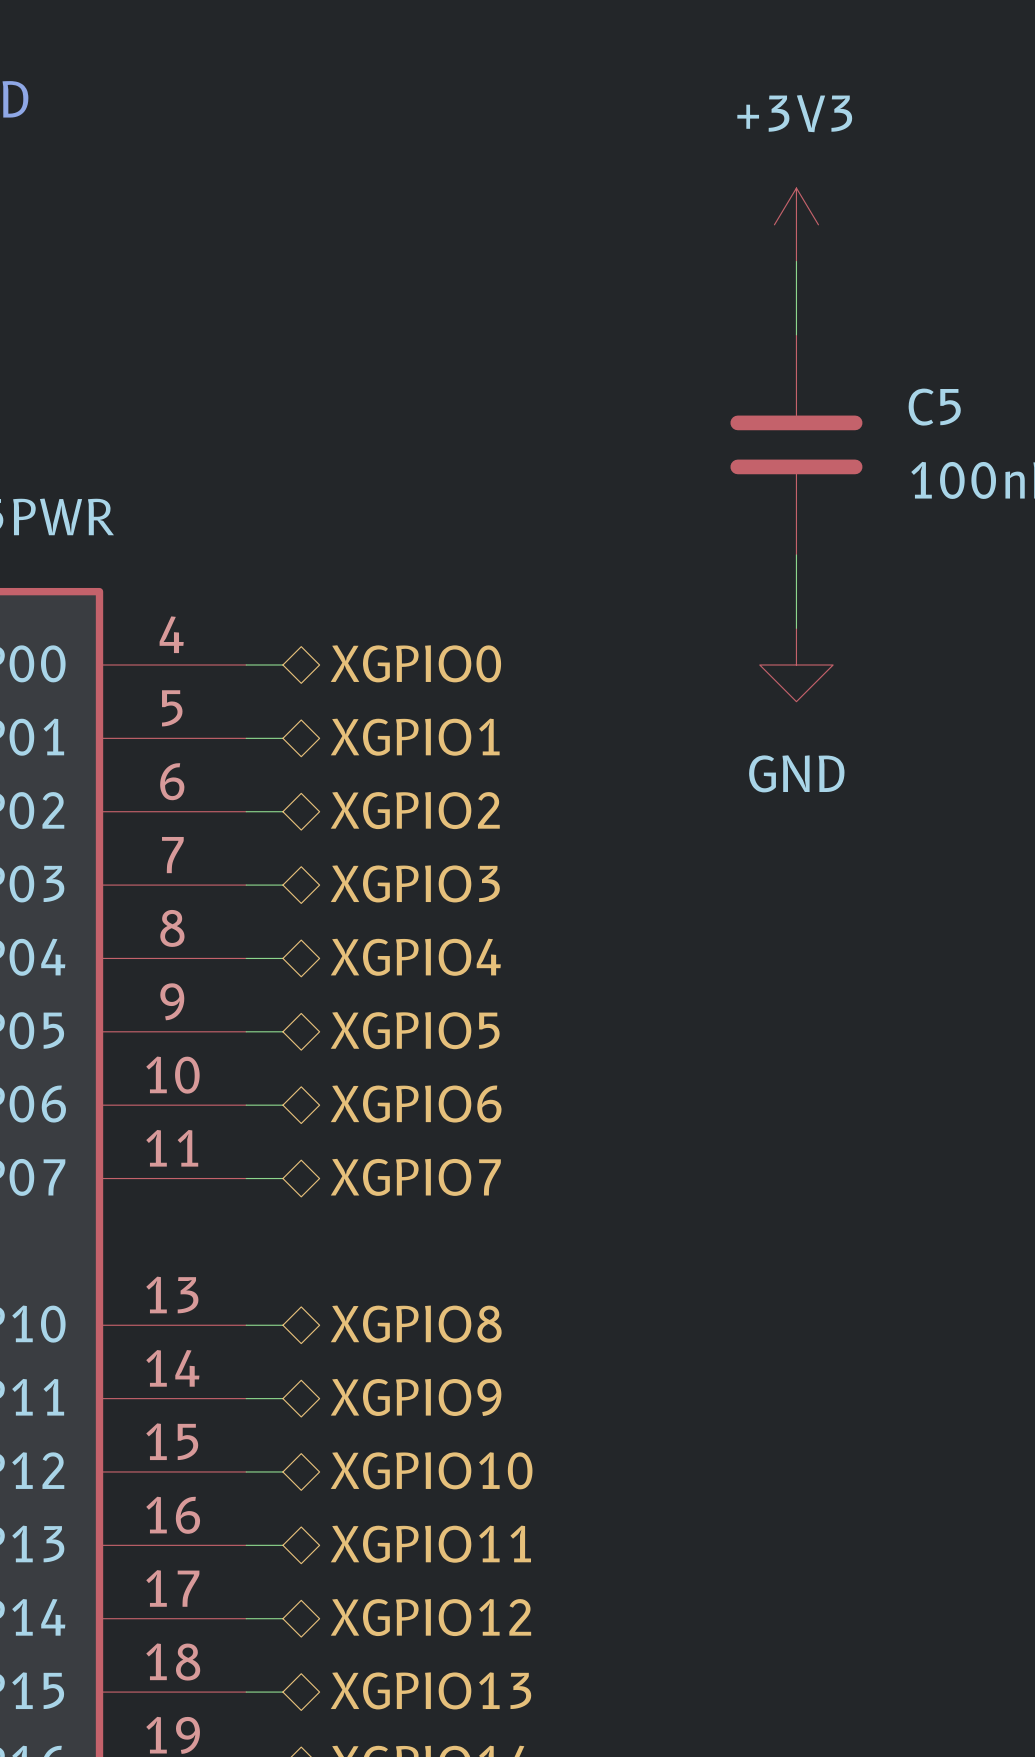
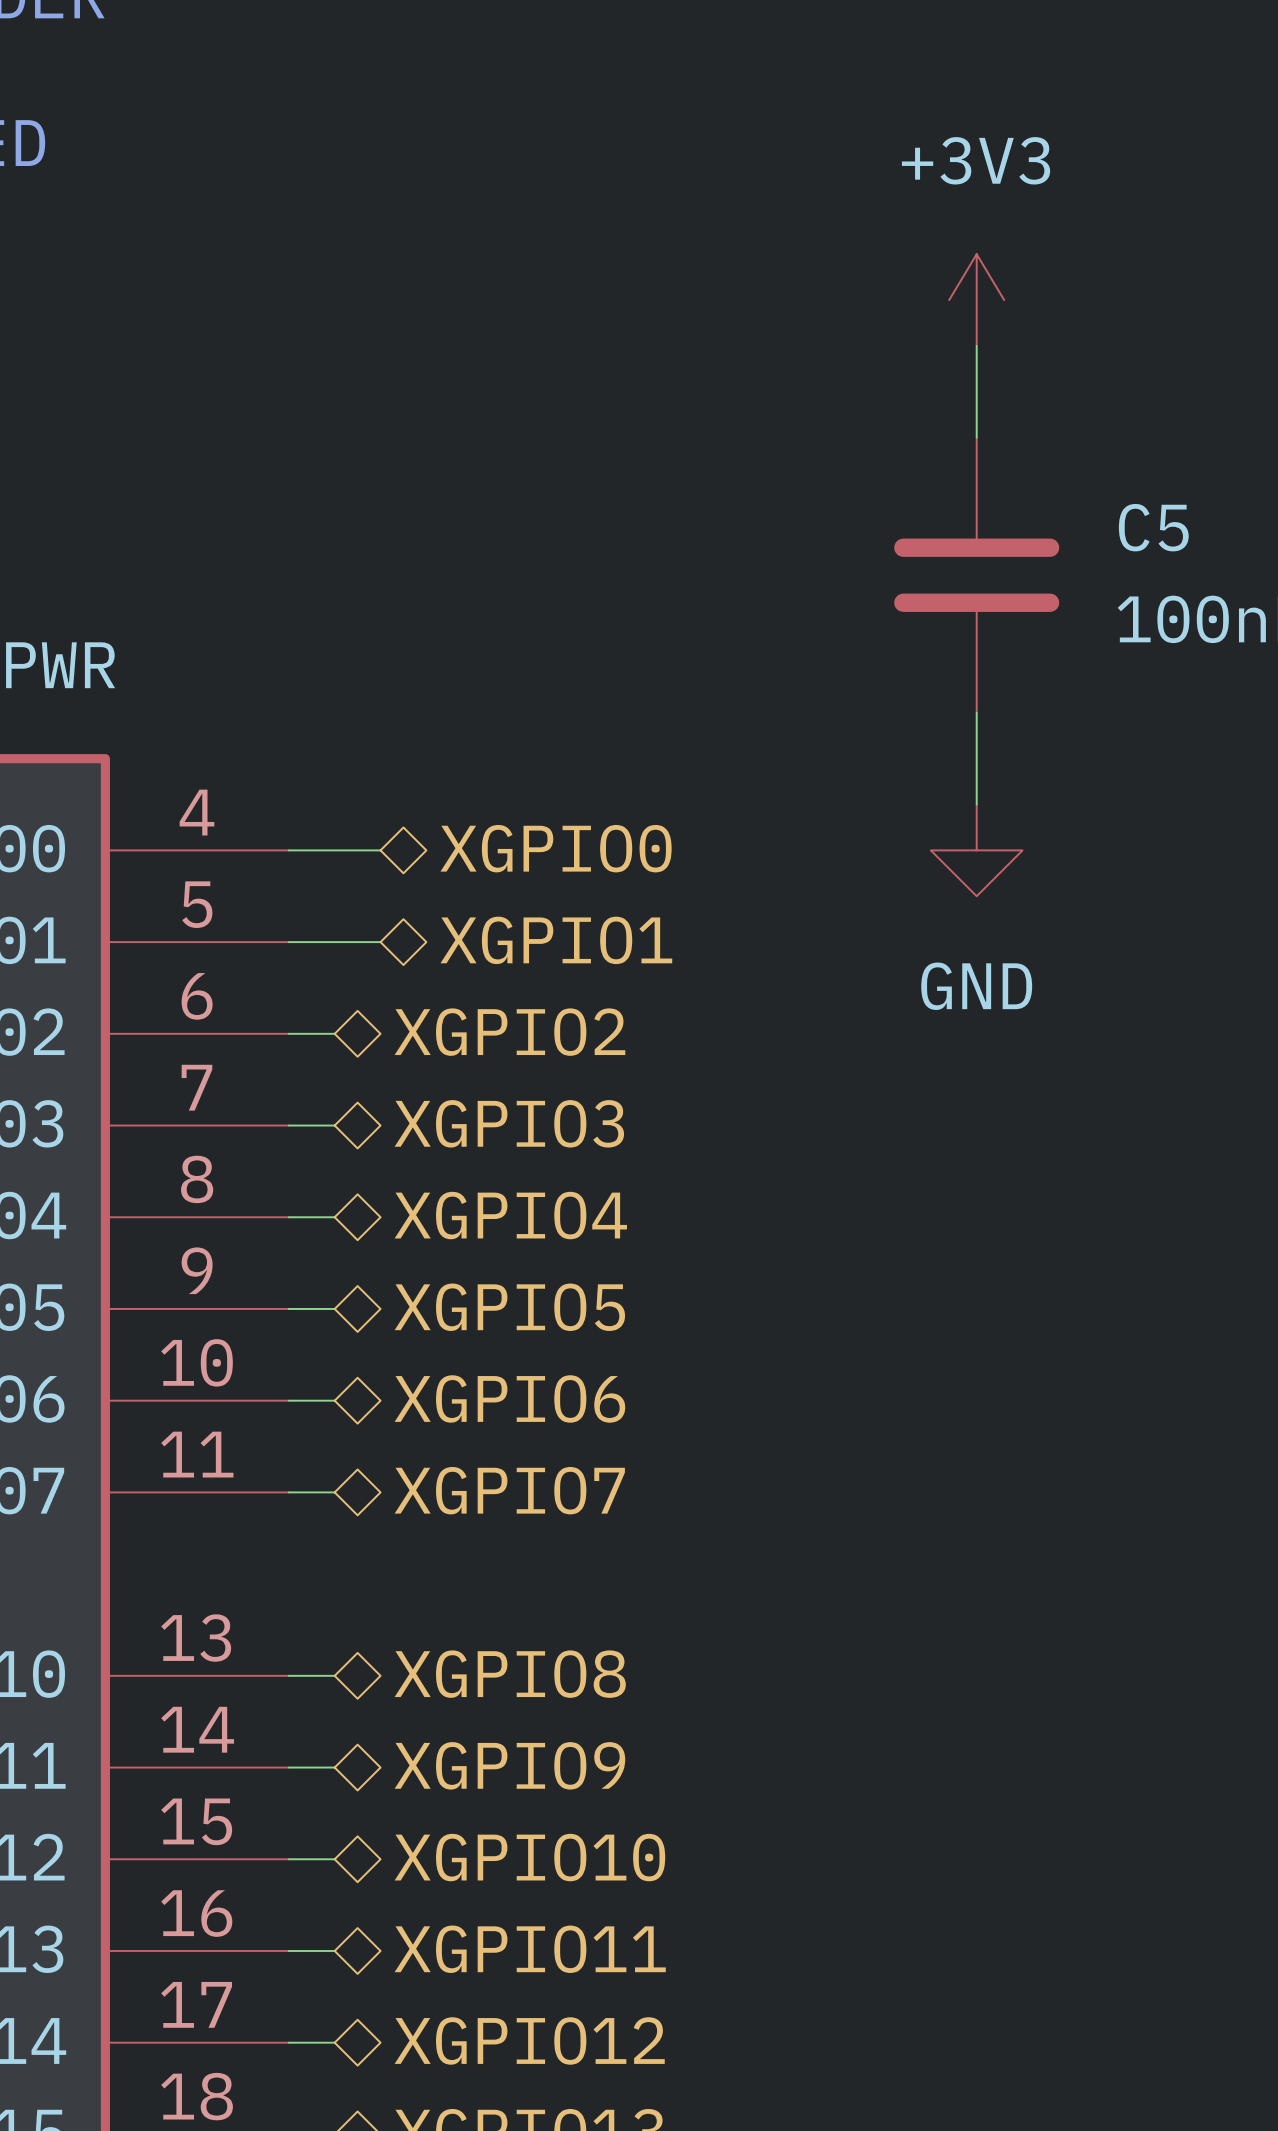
hierarchical label position: XGPIO0 (415, 663) -> XGPIO0 (556, 848)
wire: none -> (334, 850) (380, 850)
hierarchical label position: XGPIO1 (415, 737) -> XGPIO1 (556, 940)
wire: none -> (334, 942) (380, 942)

